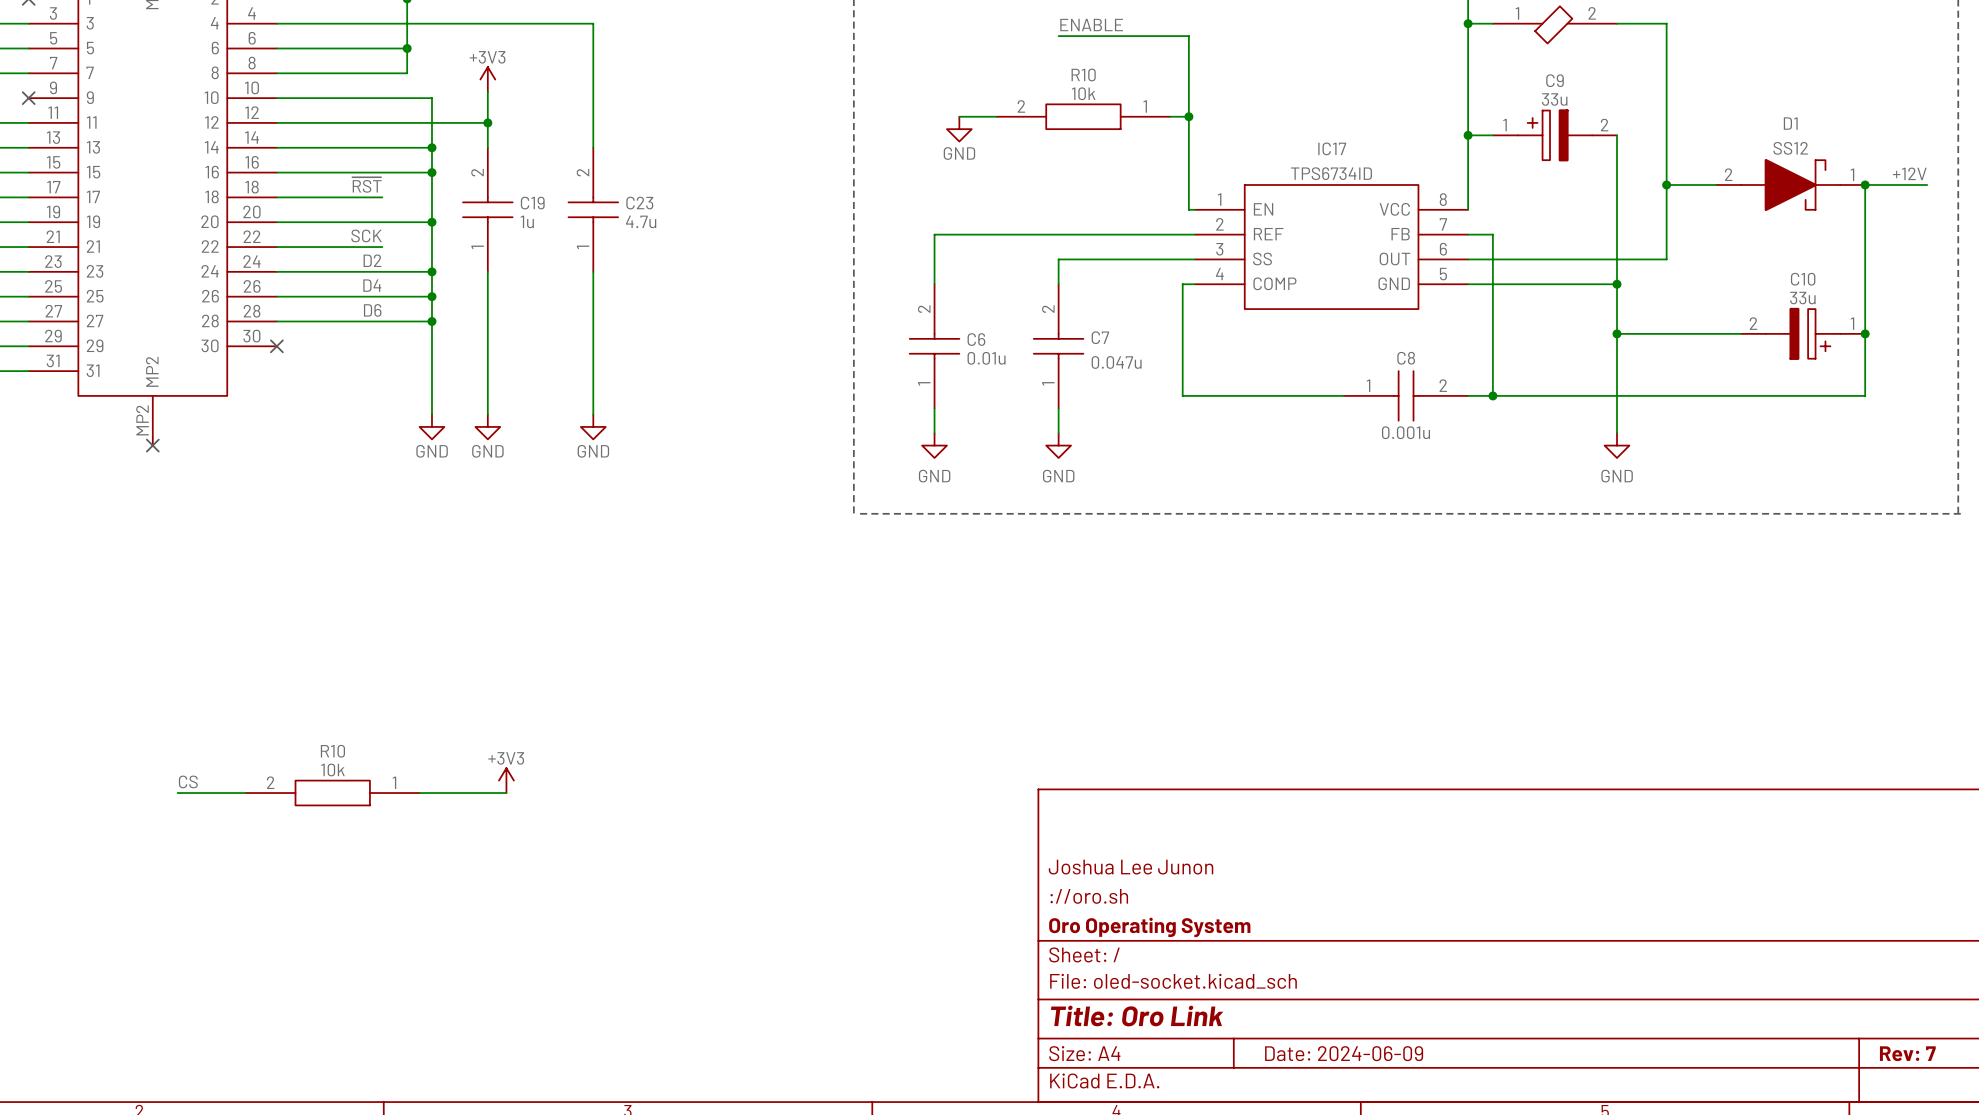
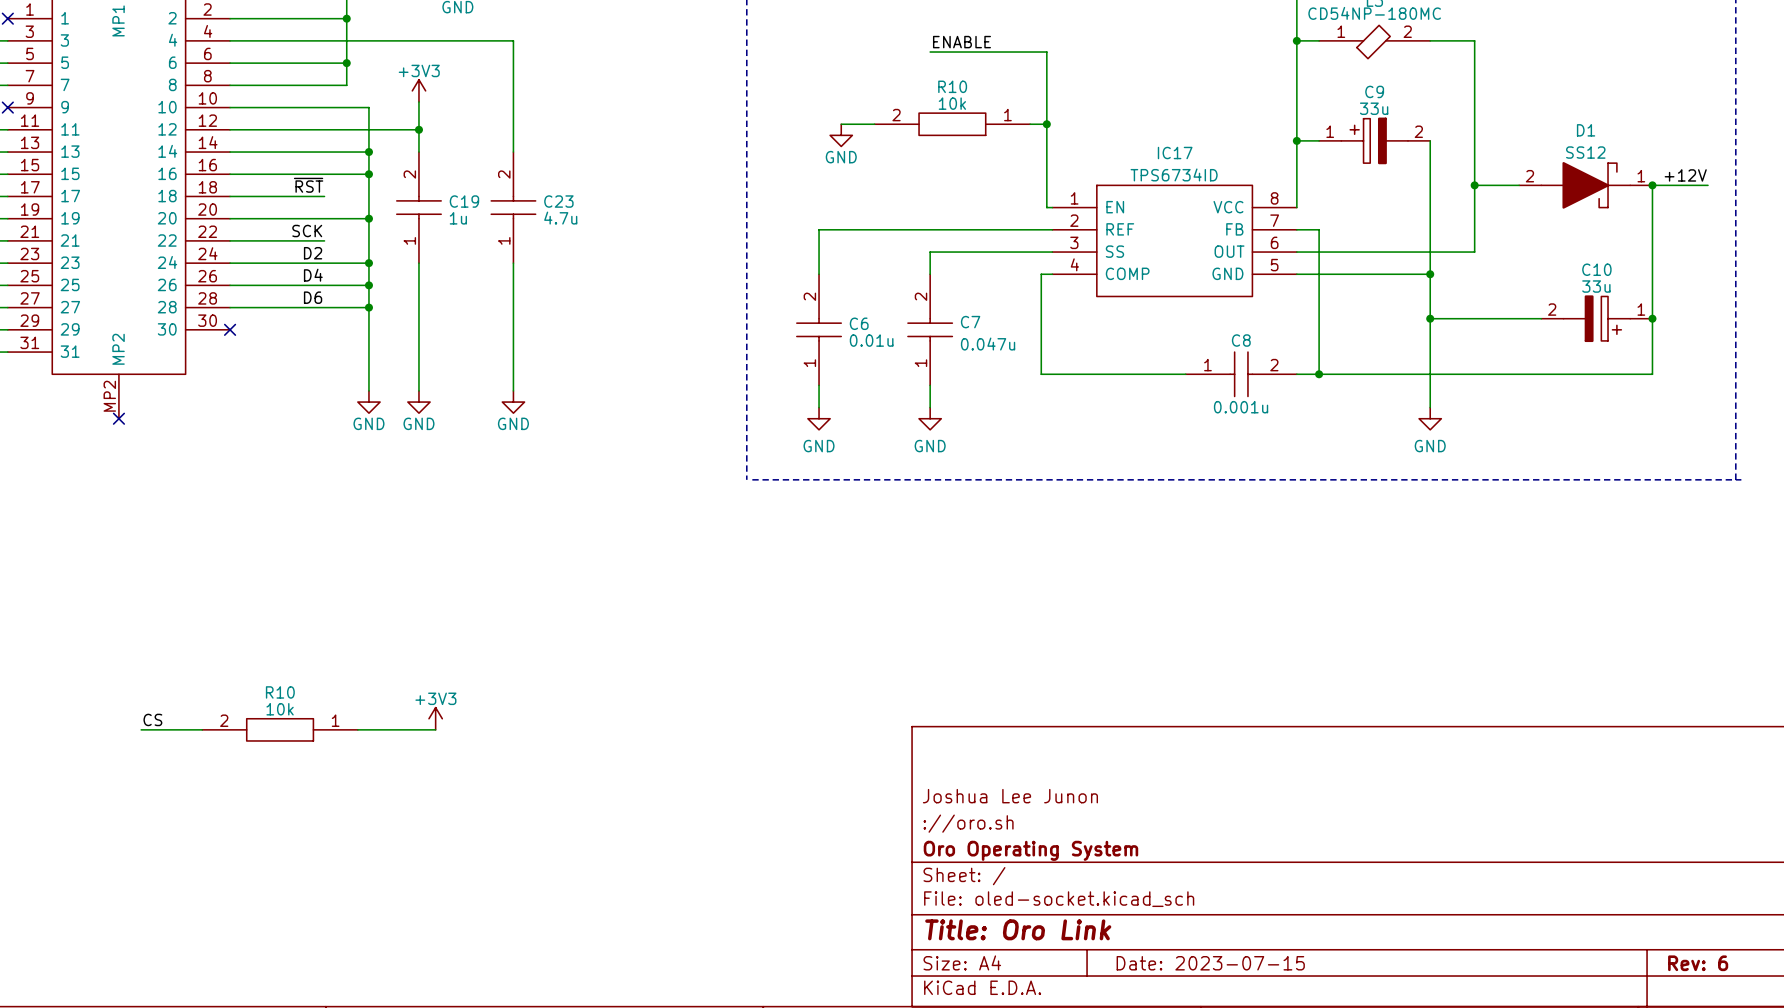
title block: Date: 2024-06-09 (1344, 1053) -> Date: 2023-07-15 (1210, 963)
title block: Rev: 7 (1907, 1053) -> Rev: 6 (1698, 963)

